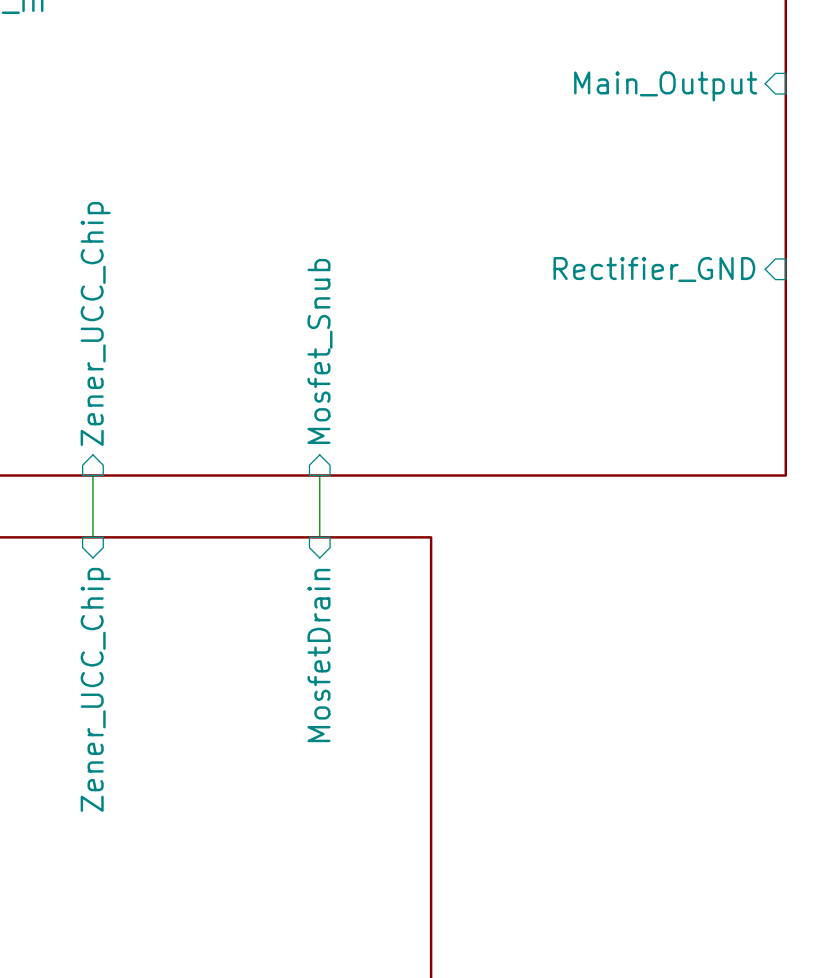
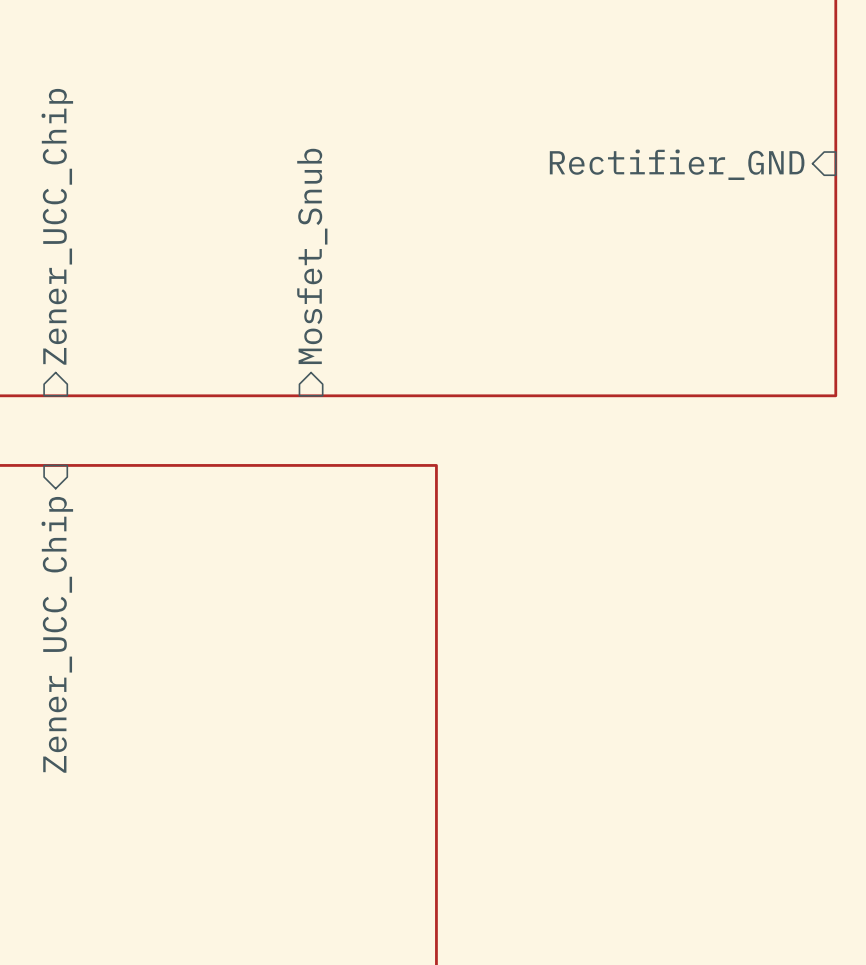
wire: (92, 475) (92, 537) -> none
wire: (319, 475) (319, 537) -> none
sheet pin: MosfetDrain (318, 655) -> none

